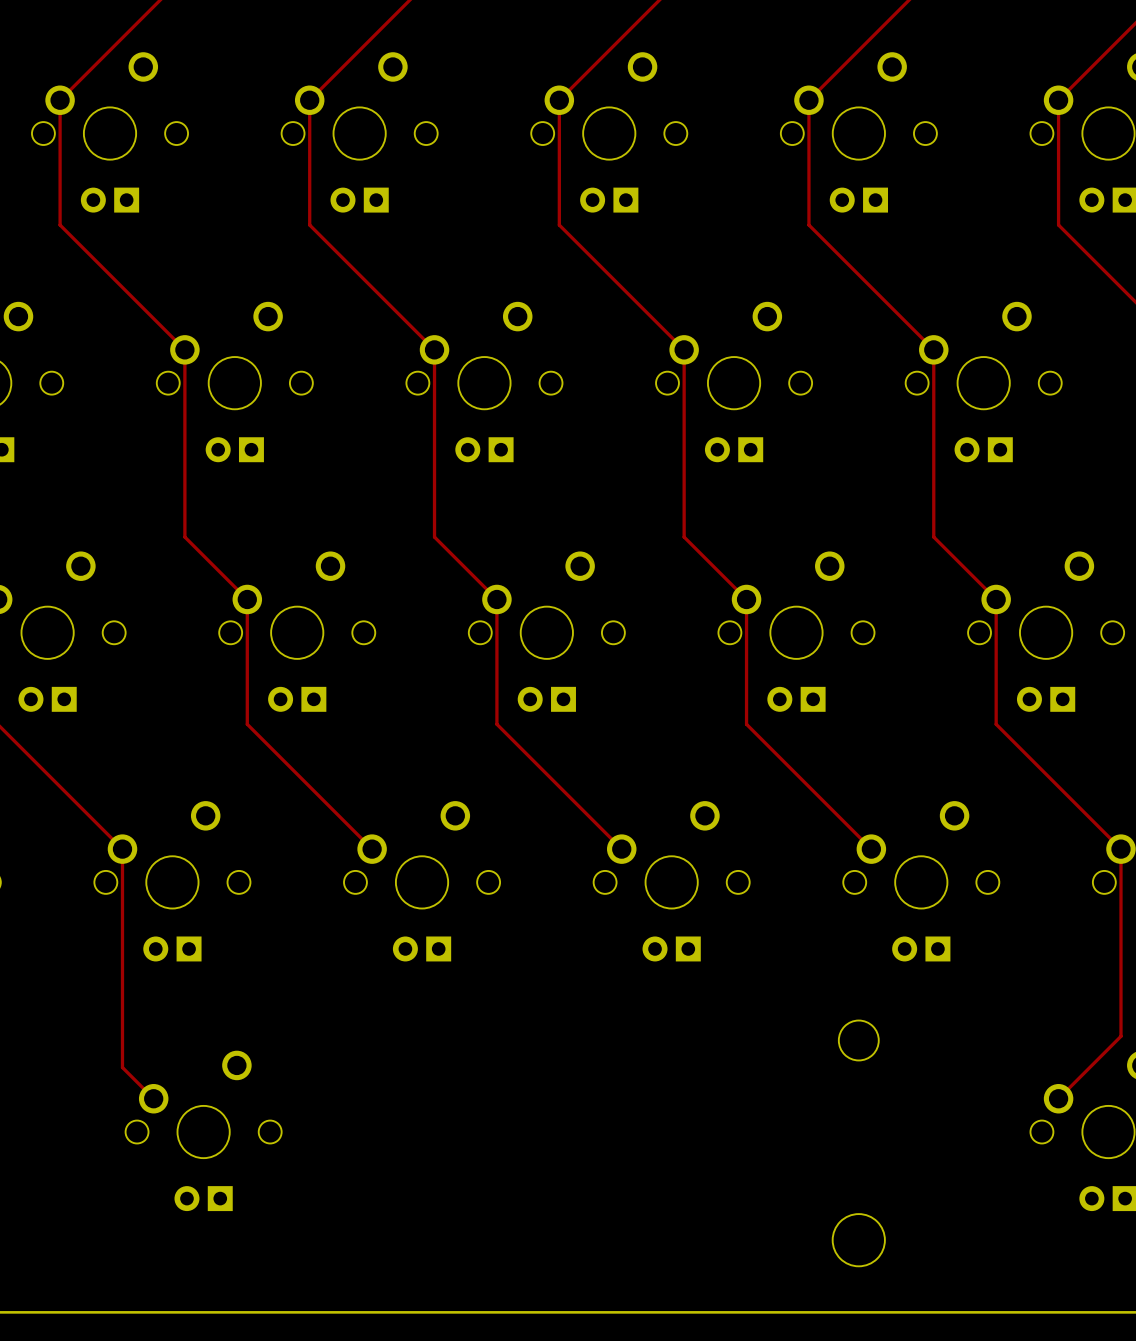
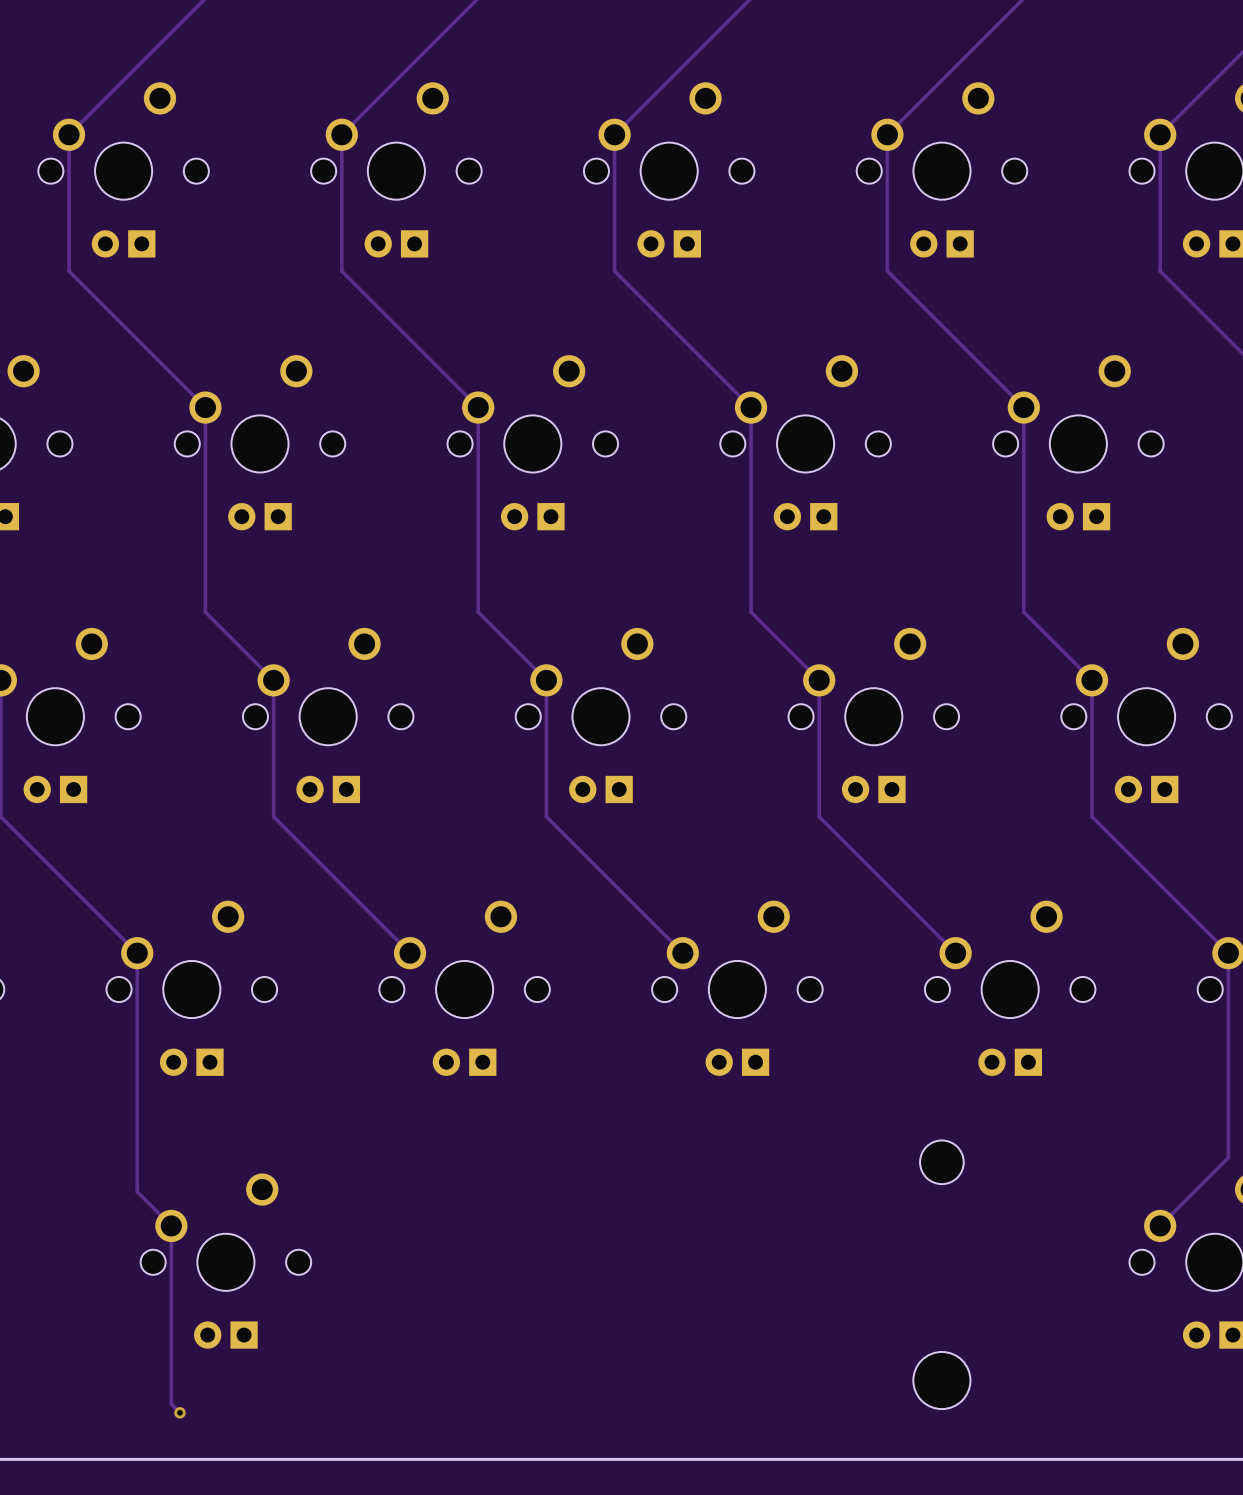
track: none -> (171, 1225) (171, 1404) (179, 1412)
via: none -> (179, 1412)

